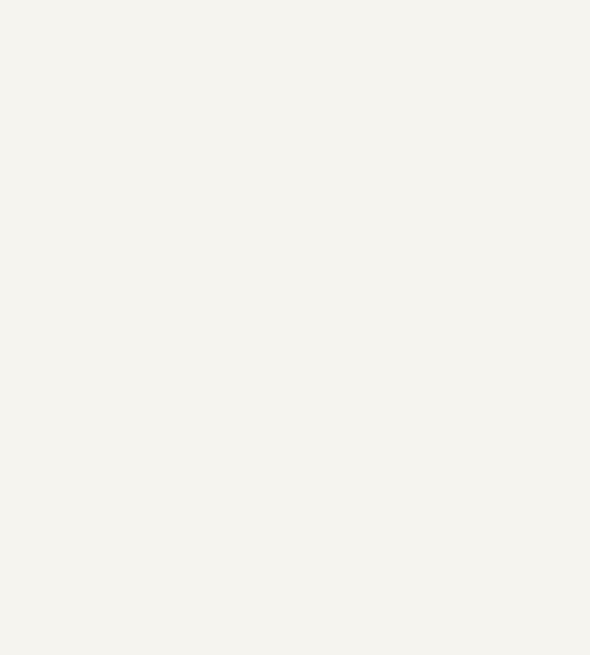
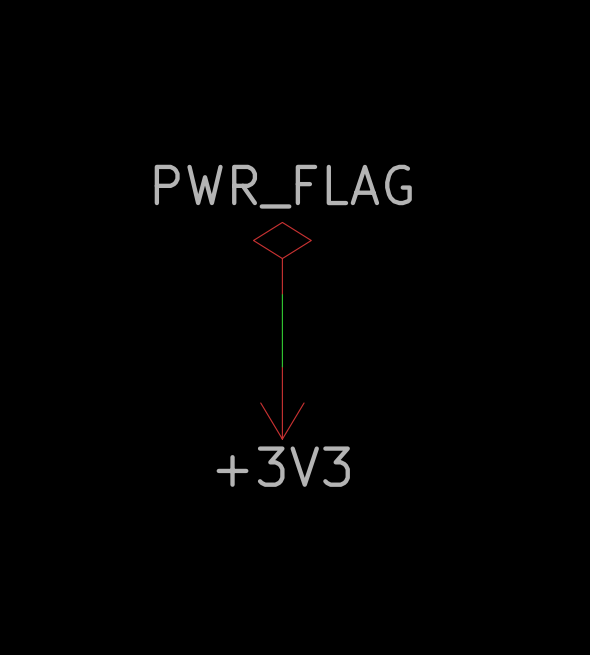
power symbol: none -> PWR_FLAG (282, 258)
wire: none -> (282, 294) (282, 366)
power symbol: none -> +3V3 (282, 402)

